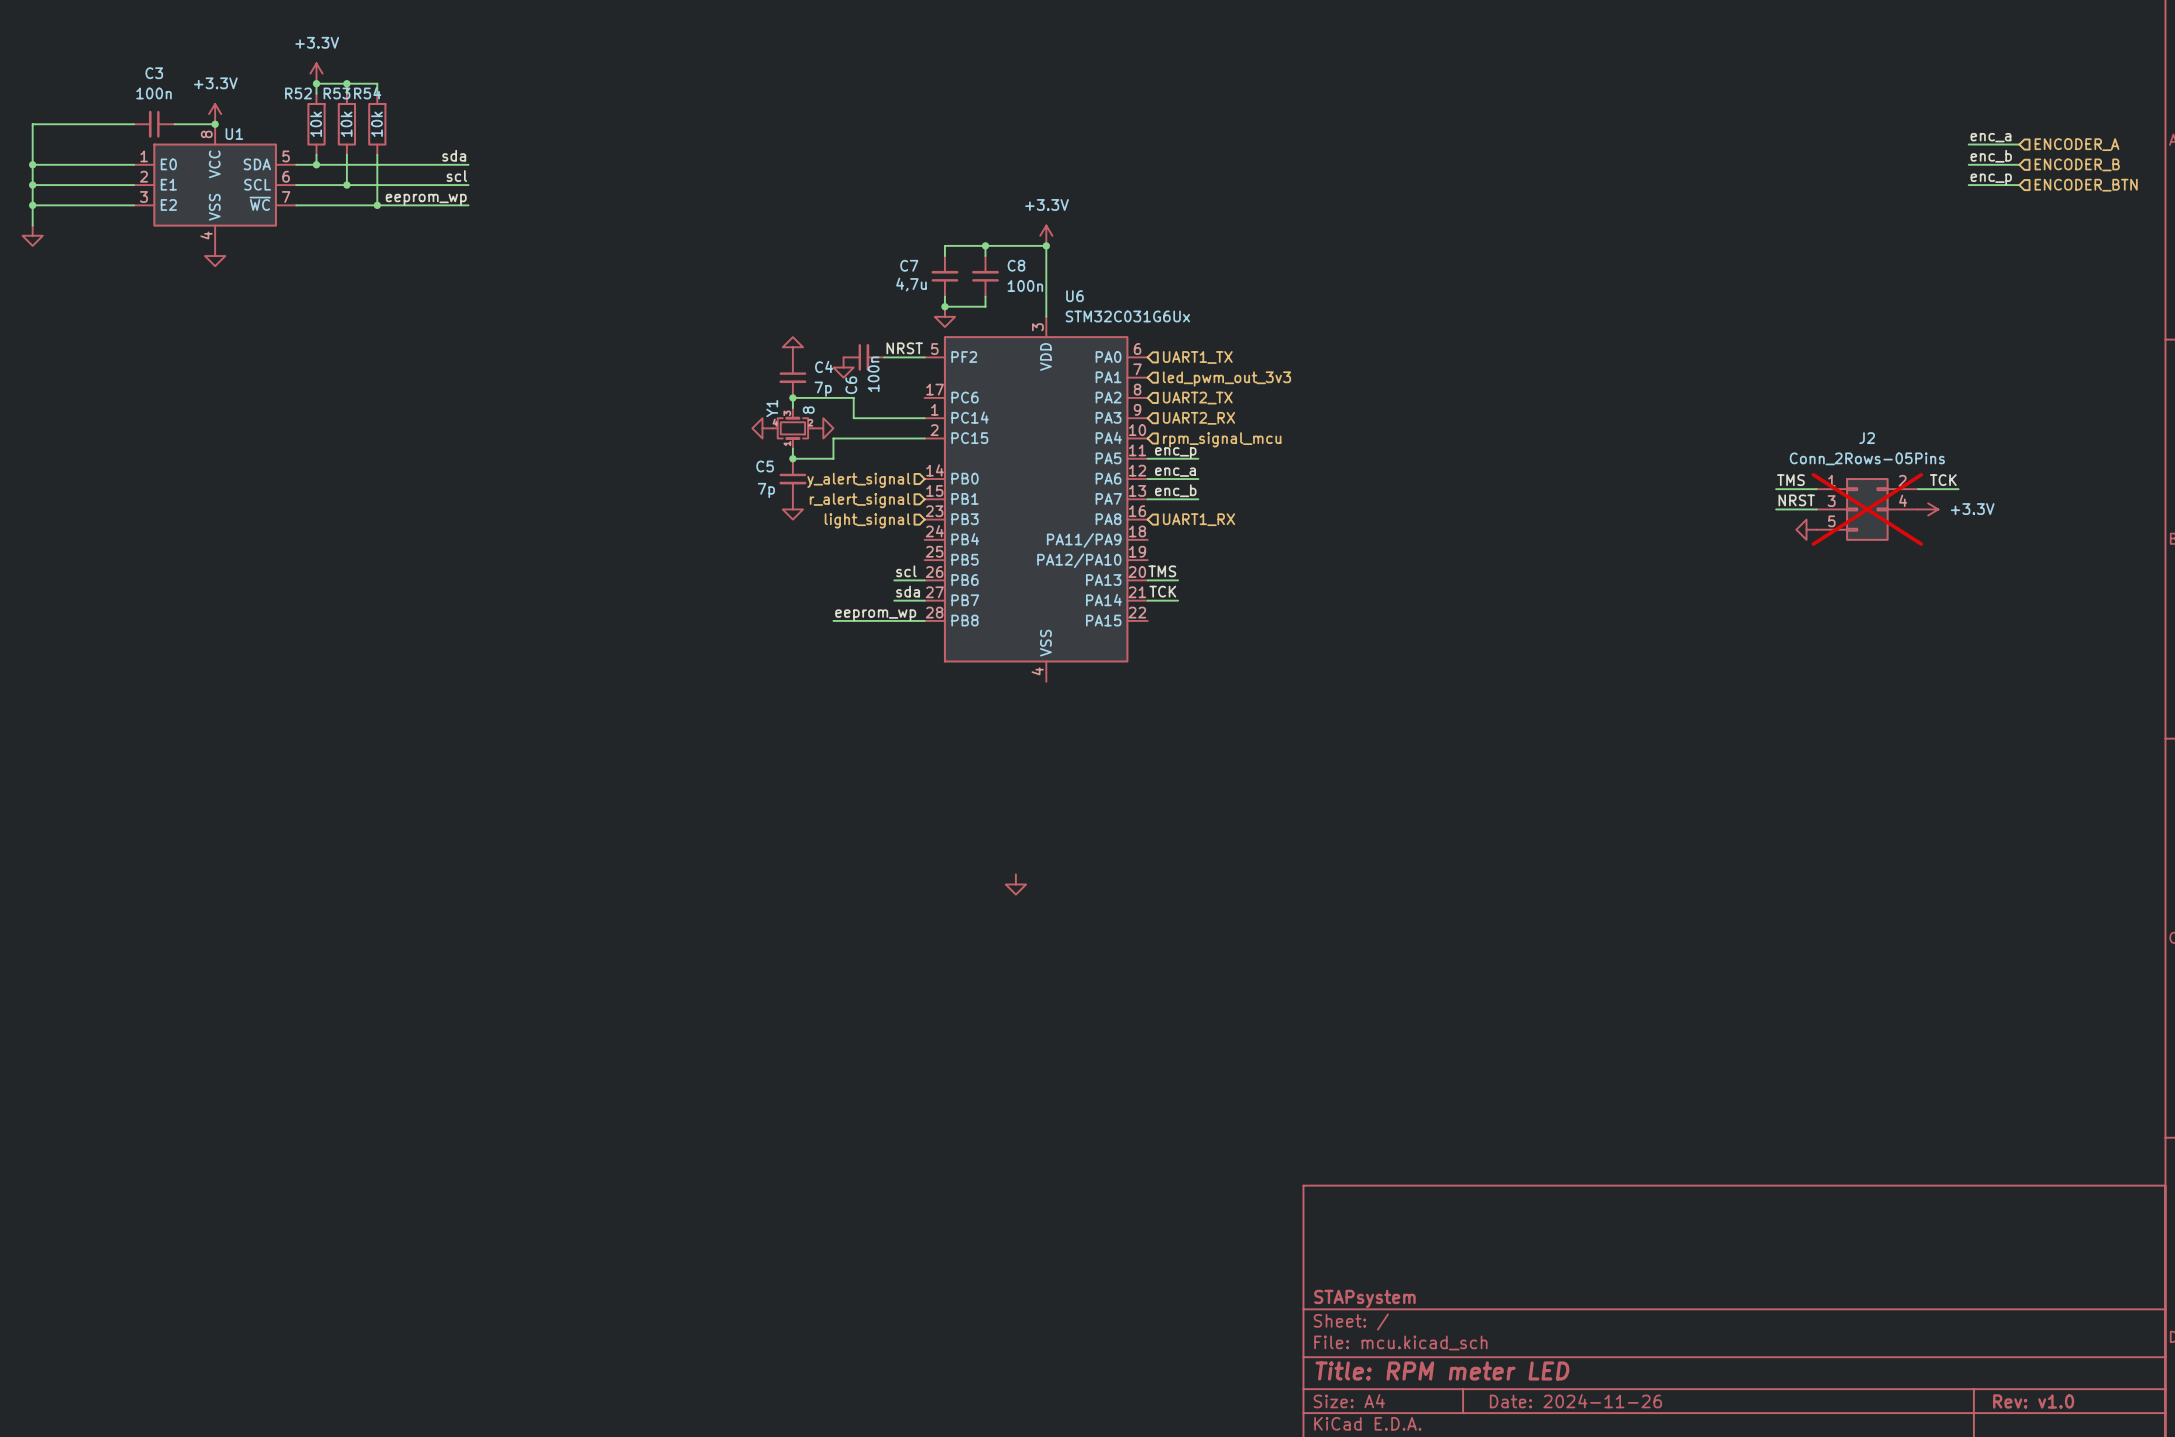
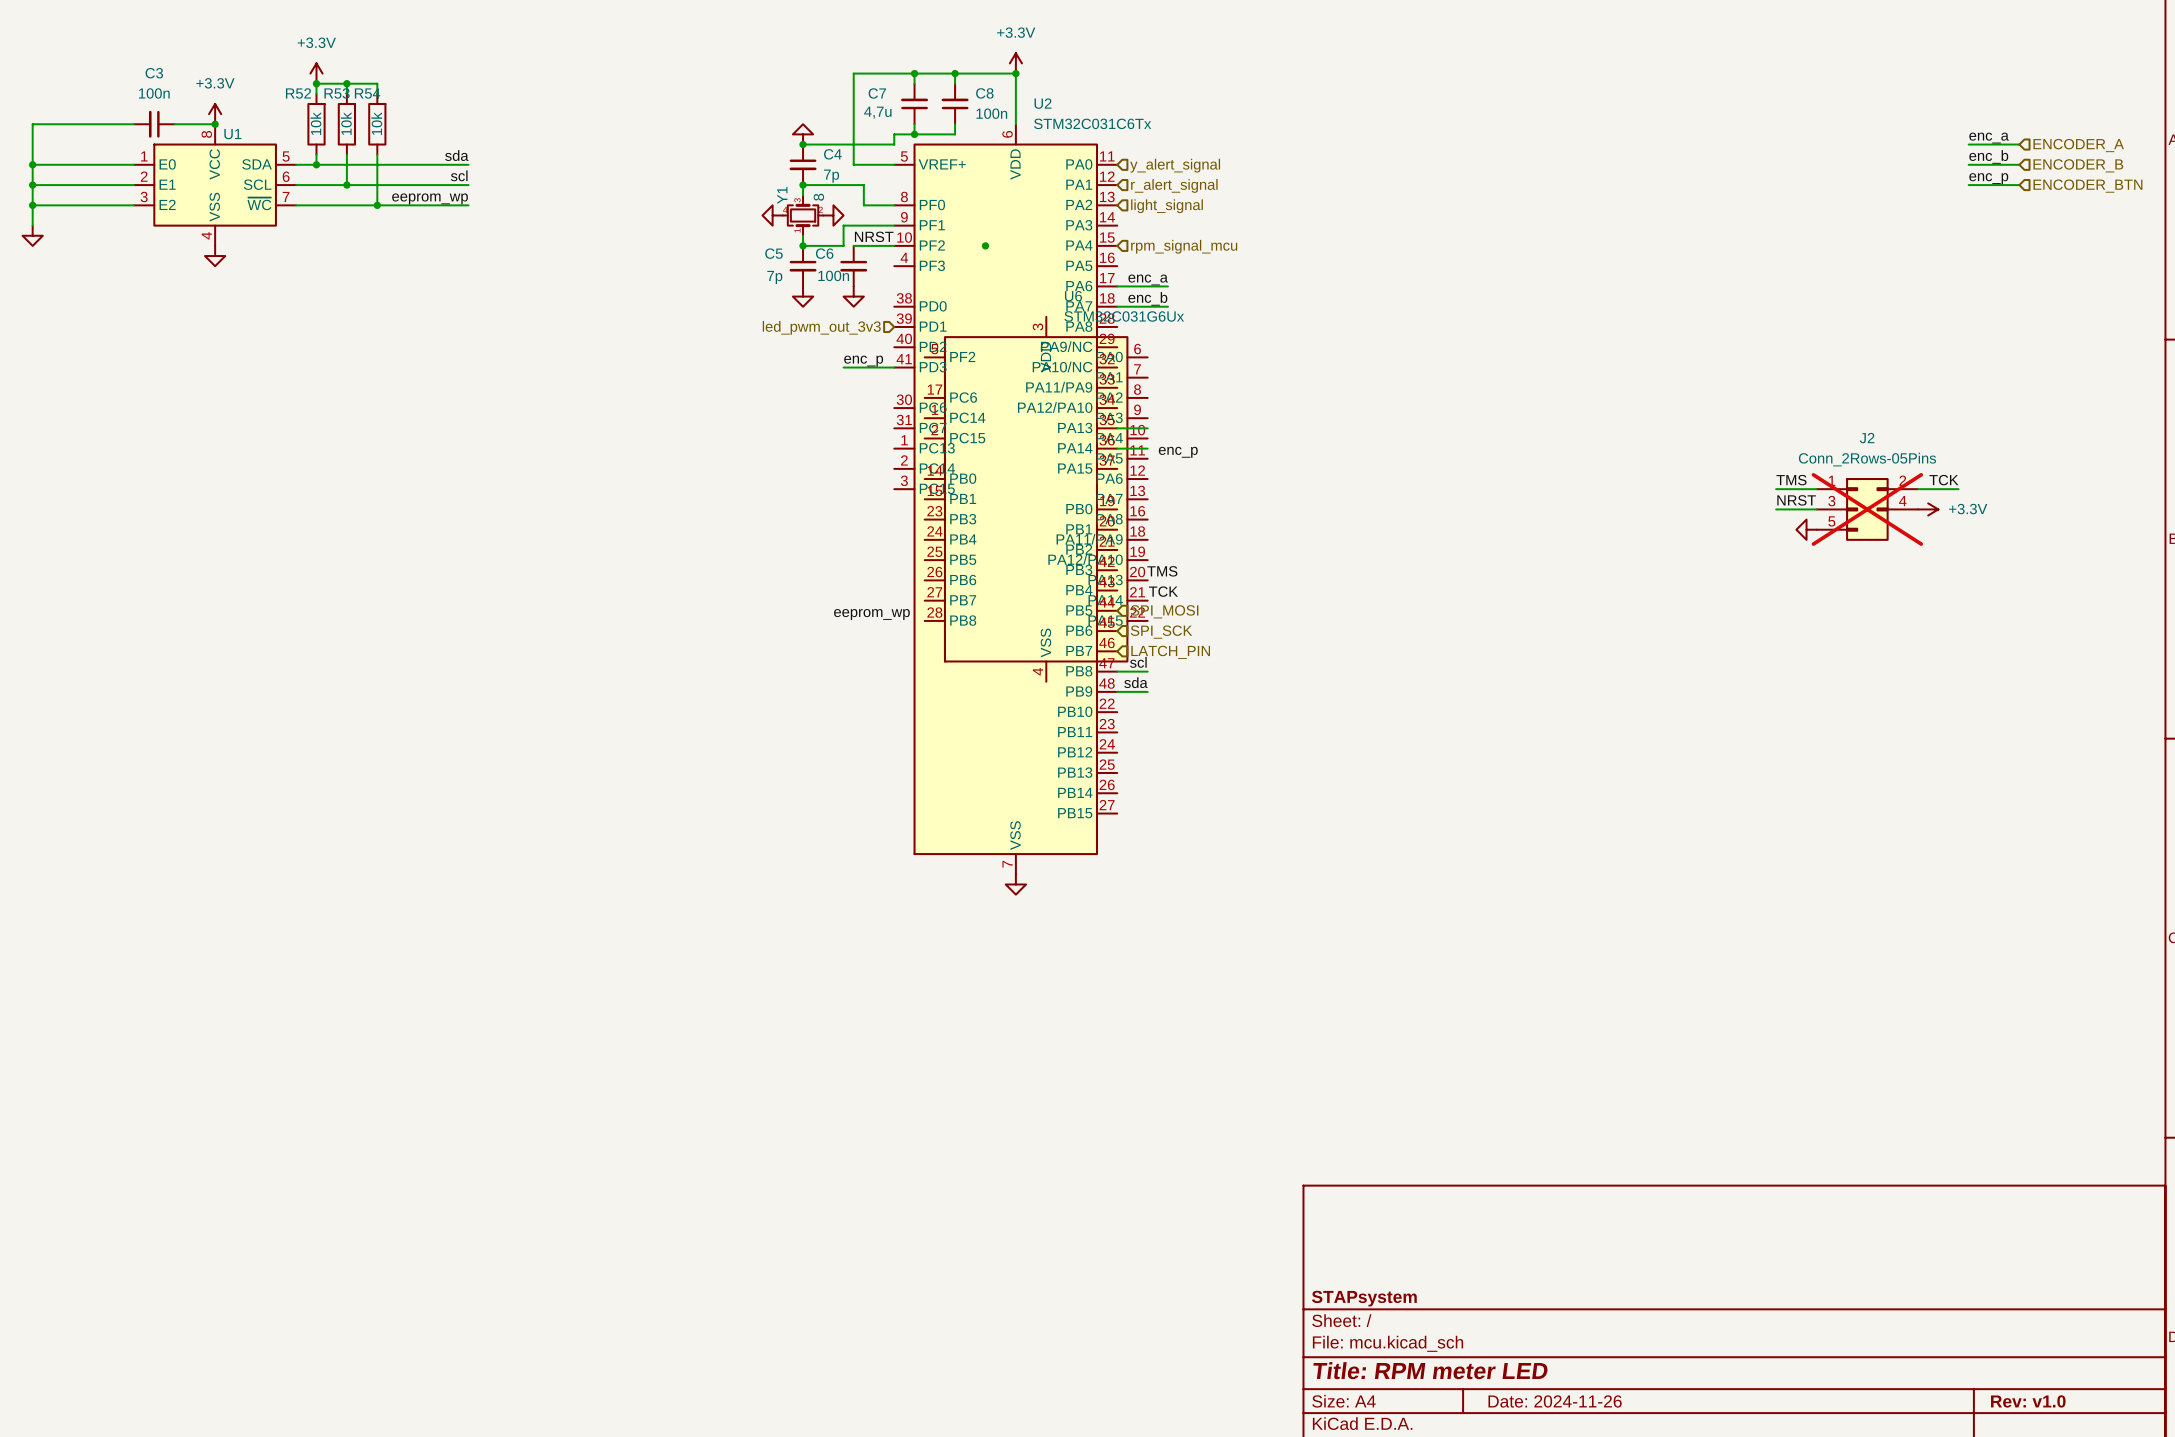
wire: none -> (914, 73) (914, 83)
junction: none -> (914, 73)
junction: none -> (955, 73)
junction: none -> (1015, 73)
wire: none -> (914, 124) (914, 134)
wire: none -> (955, 124) (955, 134) (894, 134) (894, 144) (803, 144)
wire: none -> (1015, 124) (1015, 73) (853, 73) (853, 164) (894, 164)
power symbol: none -> (803, 134)
junction: none -> (914, 134)
junction: none -> (803, 144)
hierarchical label: none -> y_alert_signal (1175, 165)
junction: none -> (803, 185)
hierarchical label: none -> r_alert_signal (1174, 185)
wire: none -> (803, 195) (803, 185) (863, 185) (863, 205) (894, 205)
hierarchical label: none -> light_signal (1167, 206)
power symbol: none -> (772, 215)
power symbol: none -> (833, 215)
wire: none -> (894, 225) (843, 225) (843, 245) (803, 245) (803, 235)
power symbol position: +3.3V (1046, 235) -> +3.3V (1015, 63)
junction: none -> (803, 245)
junction: (1046, 245) -> none
C7 position: (944, 276) -> (914, 103)
C8 position: (985, 276) -> (955, 103)
power symbol: none -> (803, 296)
power symbol: none -> (853, 296)
junction: (944, 306) -> none
power symbol: (944, 316) -> none
hierarchical label: none -> led_pwm_out_3v3 (821, 327)
power symbol: (792, 347) -> none
label position: NRST (904, 348) -> NRST (874, 236)
C6 rotation: 0° (863, 357) -> 90° clockwise (853, 266)
C6 position: (863, 357) -> (853, 266)
wire: (884, 357) (924, 357) -> (853, 245) (894, 245)
hierarchical label: UART1_TX (1197, 357) -> none
label: none -> enc_p (863, 361)
wire: none -> (843, 367) (894, 367)
power symbol: (843, 367) -> none
C4 position: (792, 377) -> (803, 164)
hierarchical label: led_pwm_out_3v3 (1226, 378) -> none
junction: (792, 397) -> none
hierarchical label: UART2_TX (1197, 398) -> none
wire: (792, 408) (792, 397) (853, 397) (853, 418) (924, 418) -> none
hierarchical label: UART2_RX (1198, 418) -> none
power symbol: (762, 428) -> none
Y1 position: (792, 428) -> (803, 215)
power symbol: (823, 428) -> none
wire: (924, 438) (833, 438) (833, 458) (792, 458) (792, 448) -> none
hierarchical label position: rpm_signal_mcu (1222, 439) -> rpm_signal_mcu (1184, 246)
wire: none -> (1117, 448) (1147, 448)
junction: (792, 458) -> none
wire: (1147, 458) (1198, 458) -> (1117, 286) (1167, 286)
label position: enc_a (1175, 472) -> enc_a (1148, 279)
C5 position: (792, 479) -> (803, 266)
wire: (1147, 479) (1198, 479) -> (1117, 306) (1167, 306)
hierarchical label: y_alert_signal (858, 480) -> none
label position: enc_b (1175, 490) -> enc_b (1147, 298)
U2: none -> STM32C031C6Tx (1005, 499)
wire: (1147, 499) (1198, 499) -> none
hierarchical label: r_alert_signal (860, 500) -> none
power symbol: (792, 509) -> none
hierarchical label: UART1_RX (1198, 519) -> none
hierarchical label: light_signal (867, 520) -> none
label: scl (906, 571) -> none
wire: (894, 580) (924, 580) -> none
wire: (1147, 580) (1178, 580) -> (1117, 671) (1147, 671)
label: sda (908, 591) -> none
wire: (894, 600) (924, 600) -> none
wire: (1147, 600) (1178, 600) -> (1117, 428) (1147, 428)
hierarchical label: none -> SPI_MOSI (1164, 611)
wire: (833, 620) (924, 620) -> none
hierarchical label: none -> SPI_SCK (1161, 632)
hierarchical label: none -> LATCH_PIN (1170, 652)
label: none -> scl (1138, 662)
label: none -> sda (1136, 682)
wire: none -> (1117, 691) (1147, 691)

